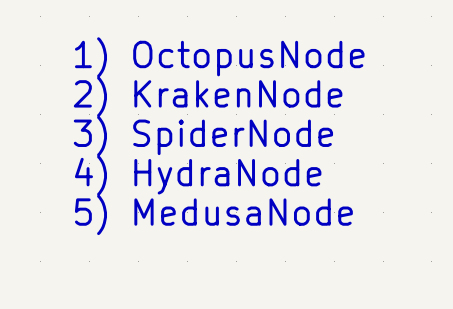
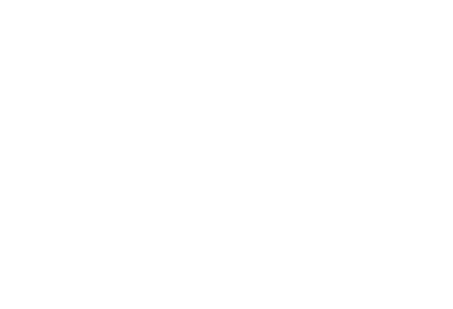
text: 1) OctopusNode (219, 57) -> none
text: 2) KrakenNode (208, 96) -> none
text: 3) SpiderNode (203, 136) -> none
text: 4) HydraNode (198, 175) -> none
text: 5) MedusaNode (213, 214) -> none

